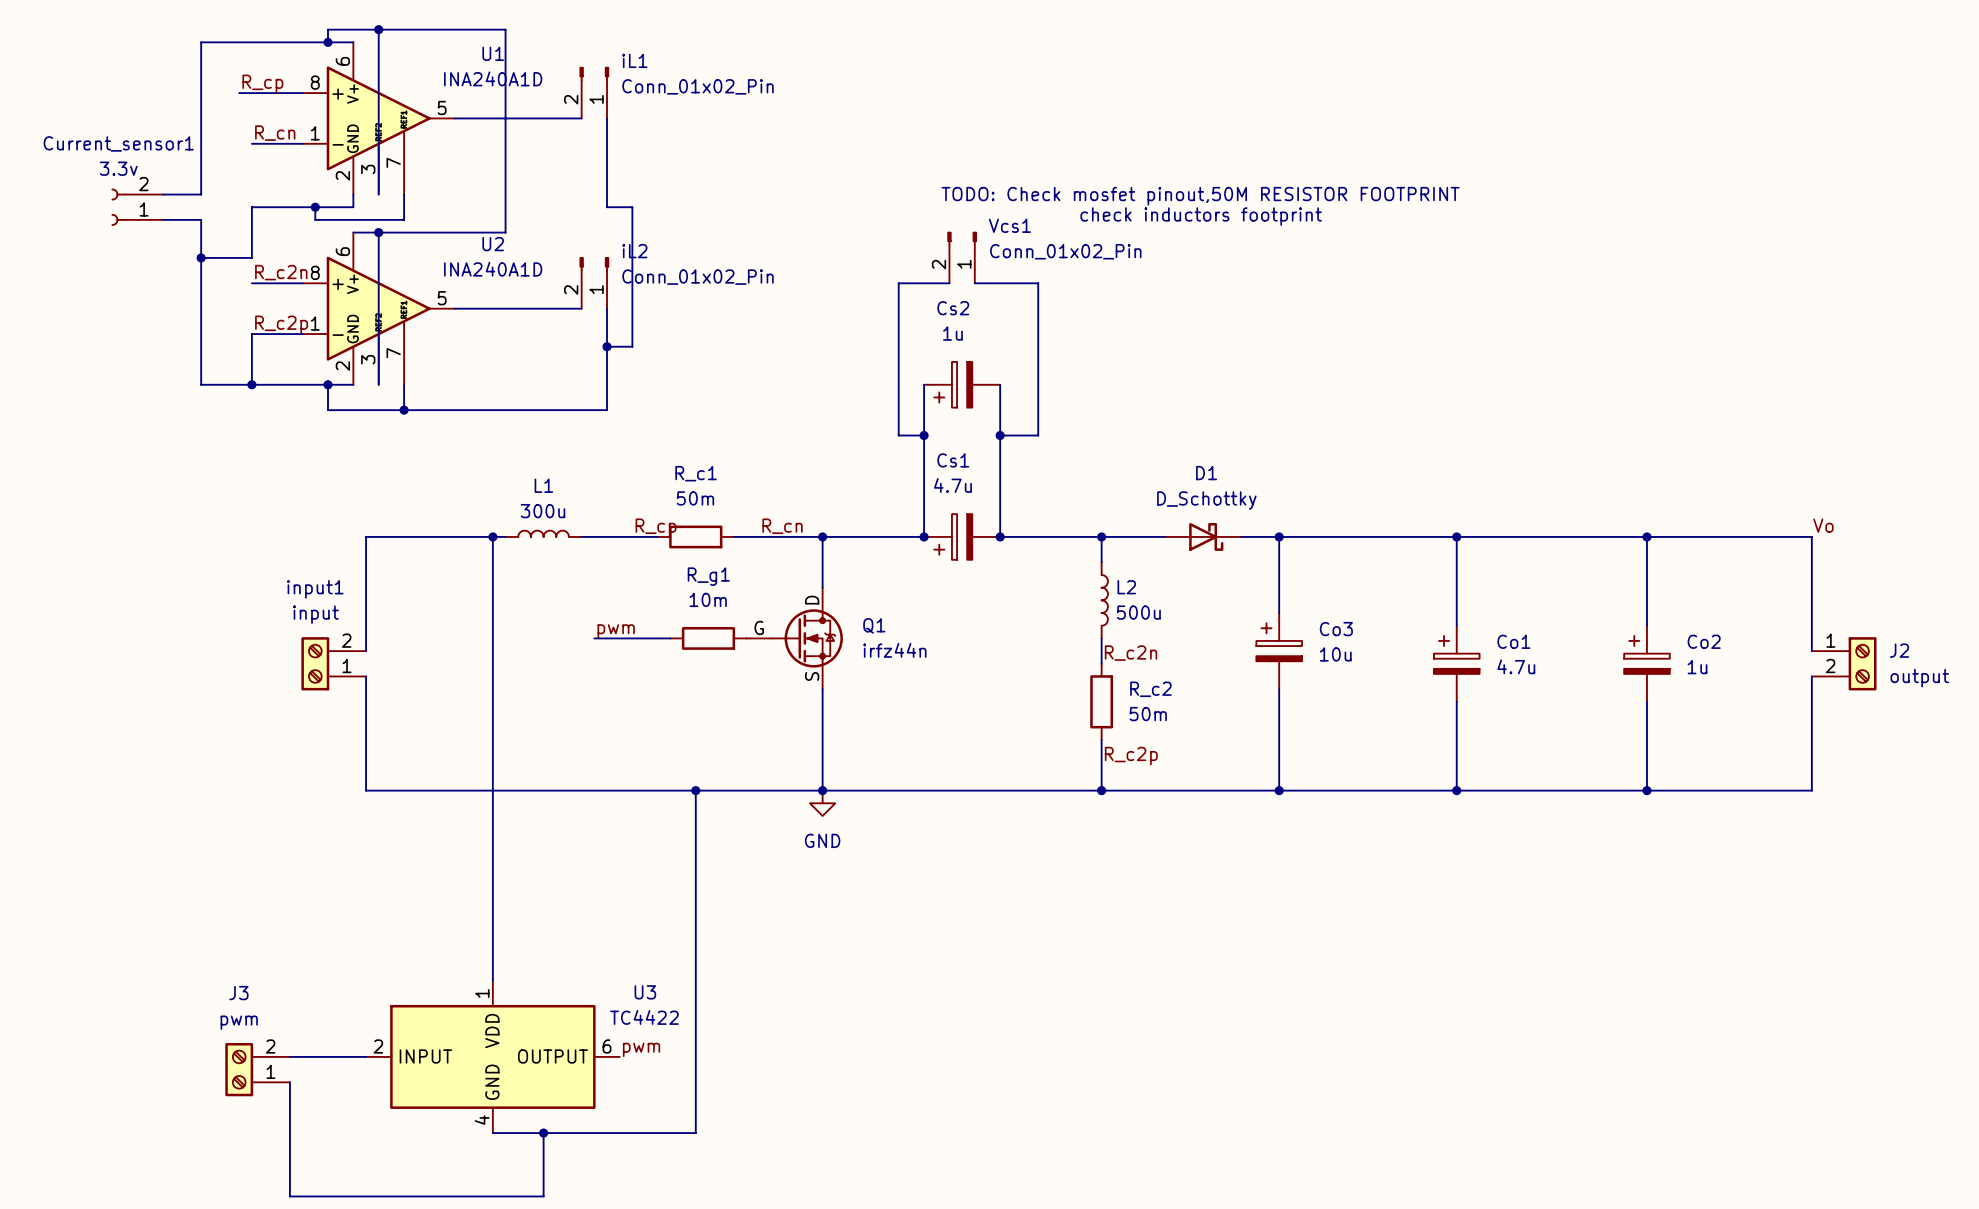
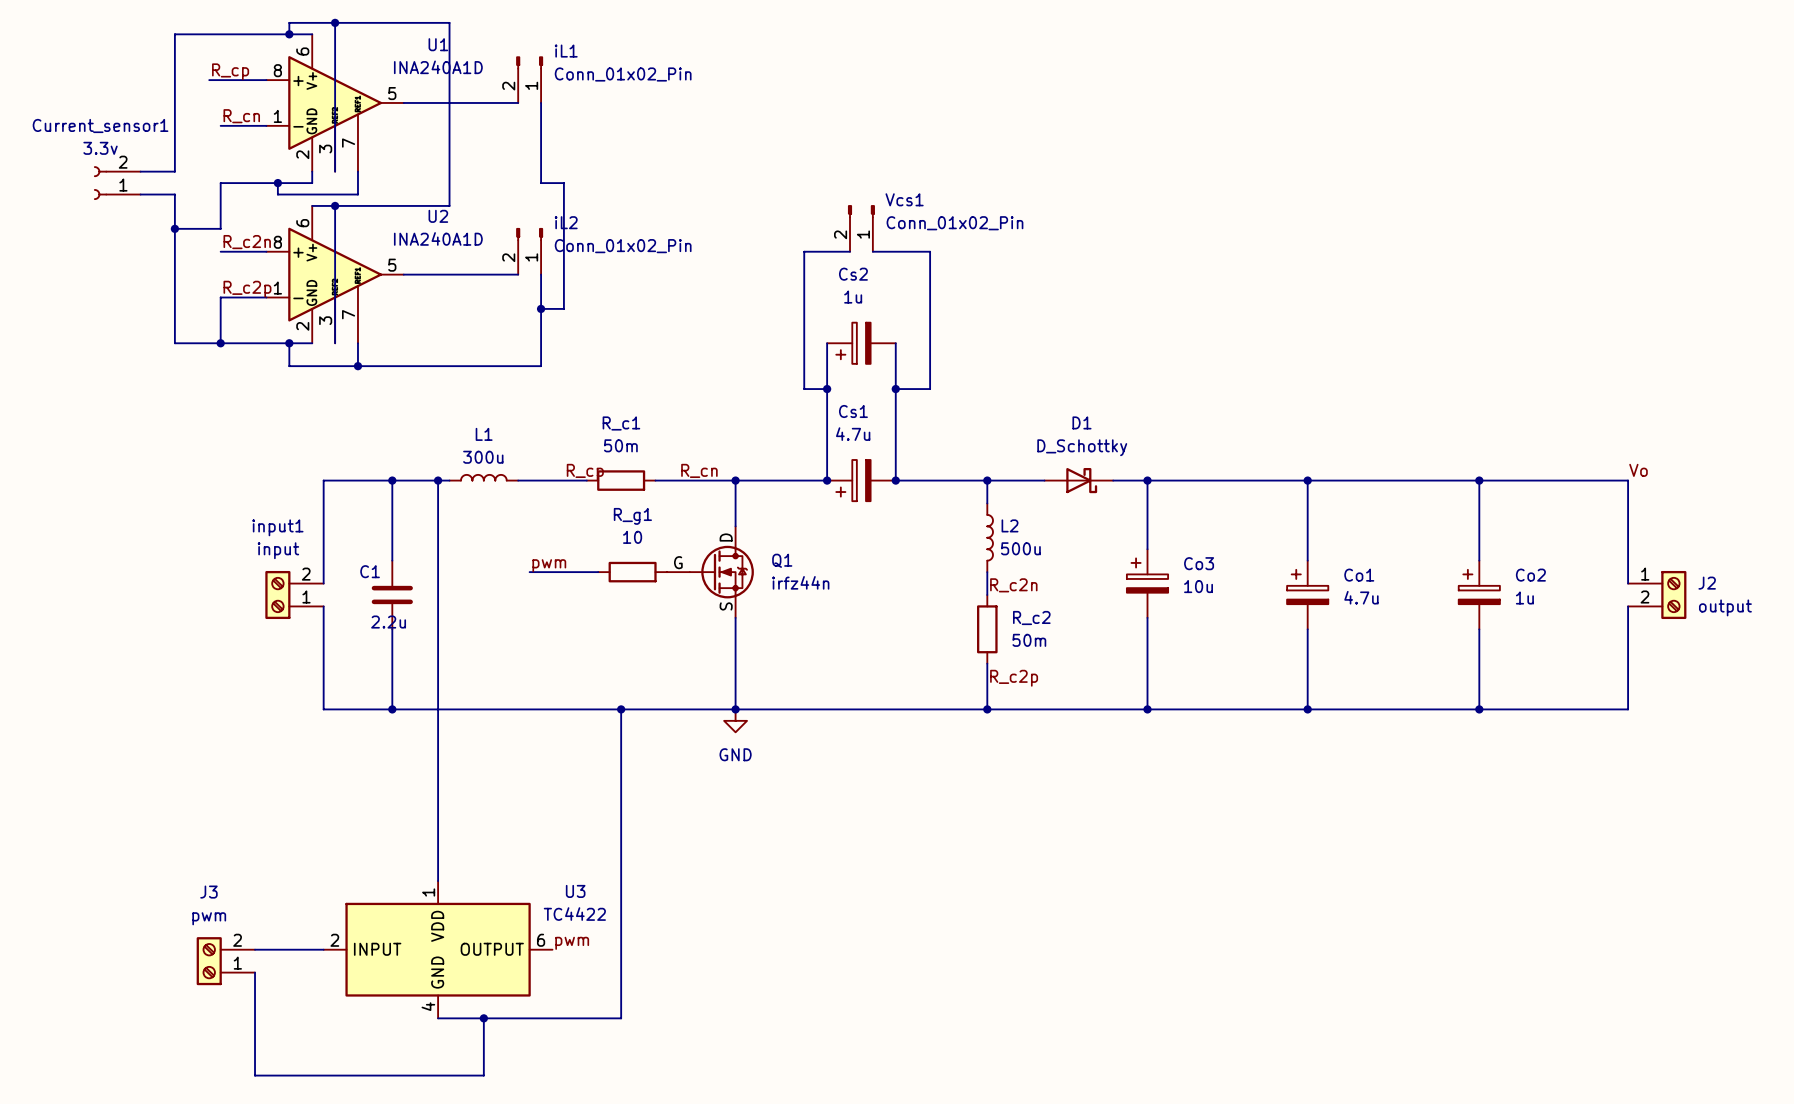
text: TODO: Check mosfet pinout,50M RESISTOR FOOTPRINT (1200, 196) -> none
text: check inductors footprint (1201, 216) -> none
wire: none -> (392, 480) (392, 560)
junction: none -> (392, 480)
R_g1 value: 10m (708, 599) -> 10 (632, 537)
C1: none -> 2.2u (392, 595)
wire: none -> (392, 629) (392, 709)
junction: none -> (392, 709)

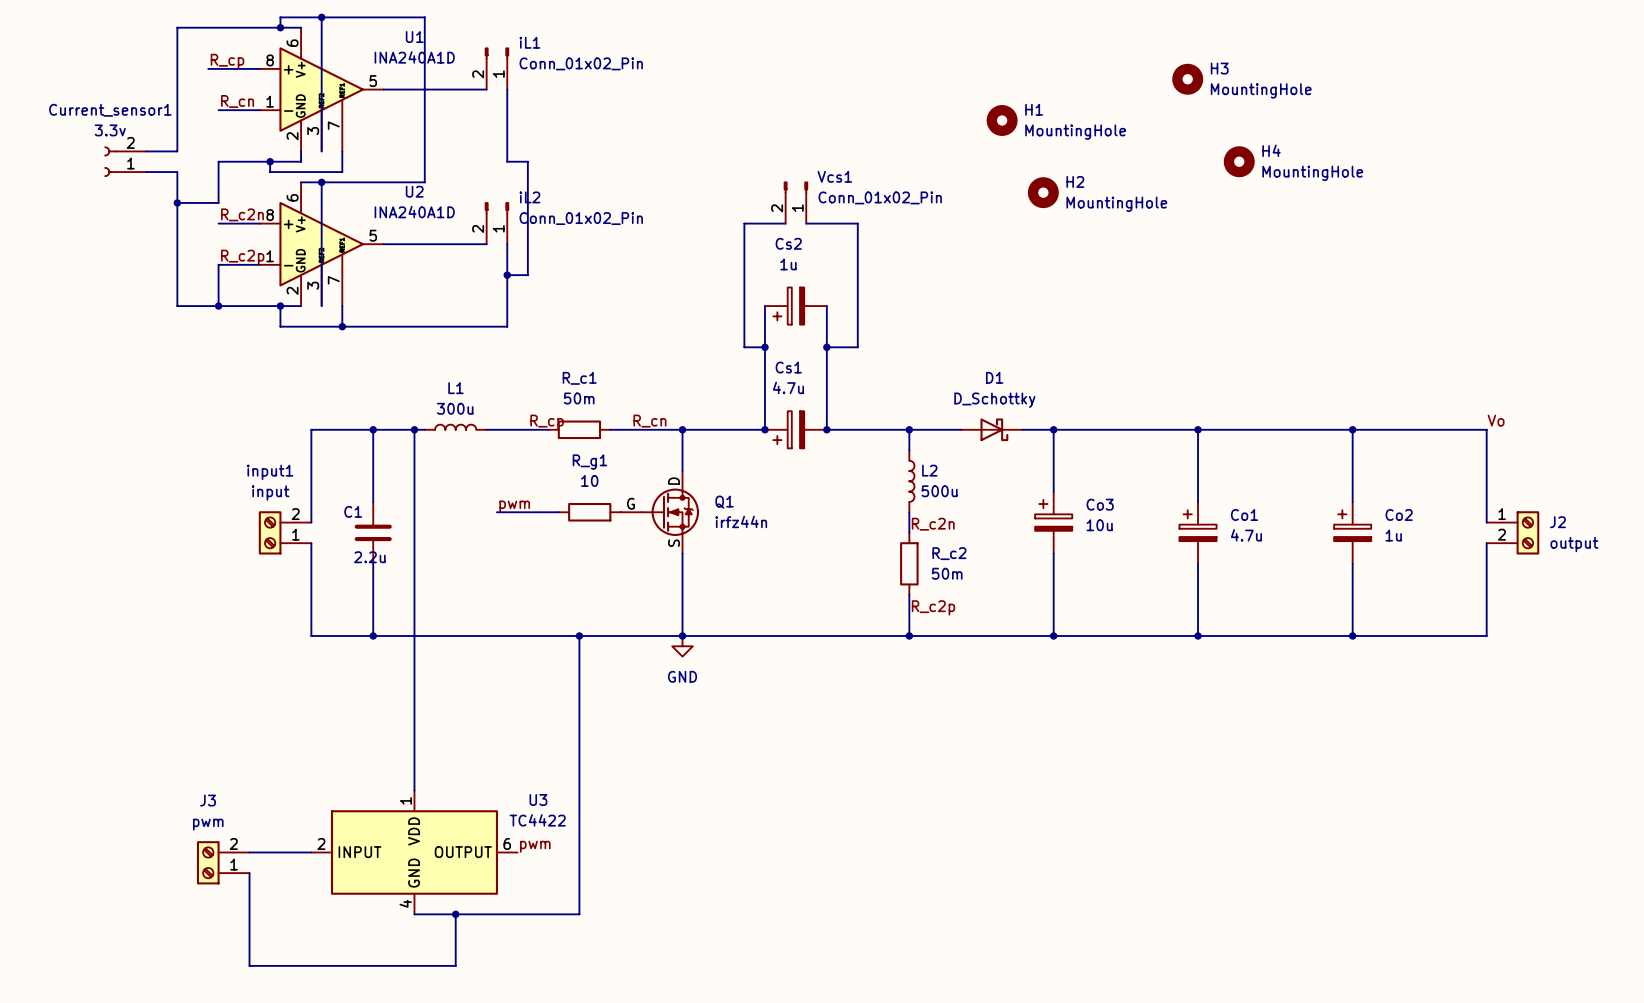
H3: none -> MountingHole (1187, 79)
H1: none -> MountingHole (1002, 120)
H4: none -> MountingHole (1239, 161)
H2: none -> MountingHole (1043, 192)

